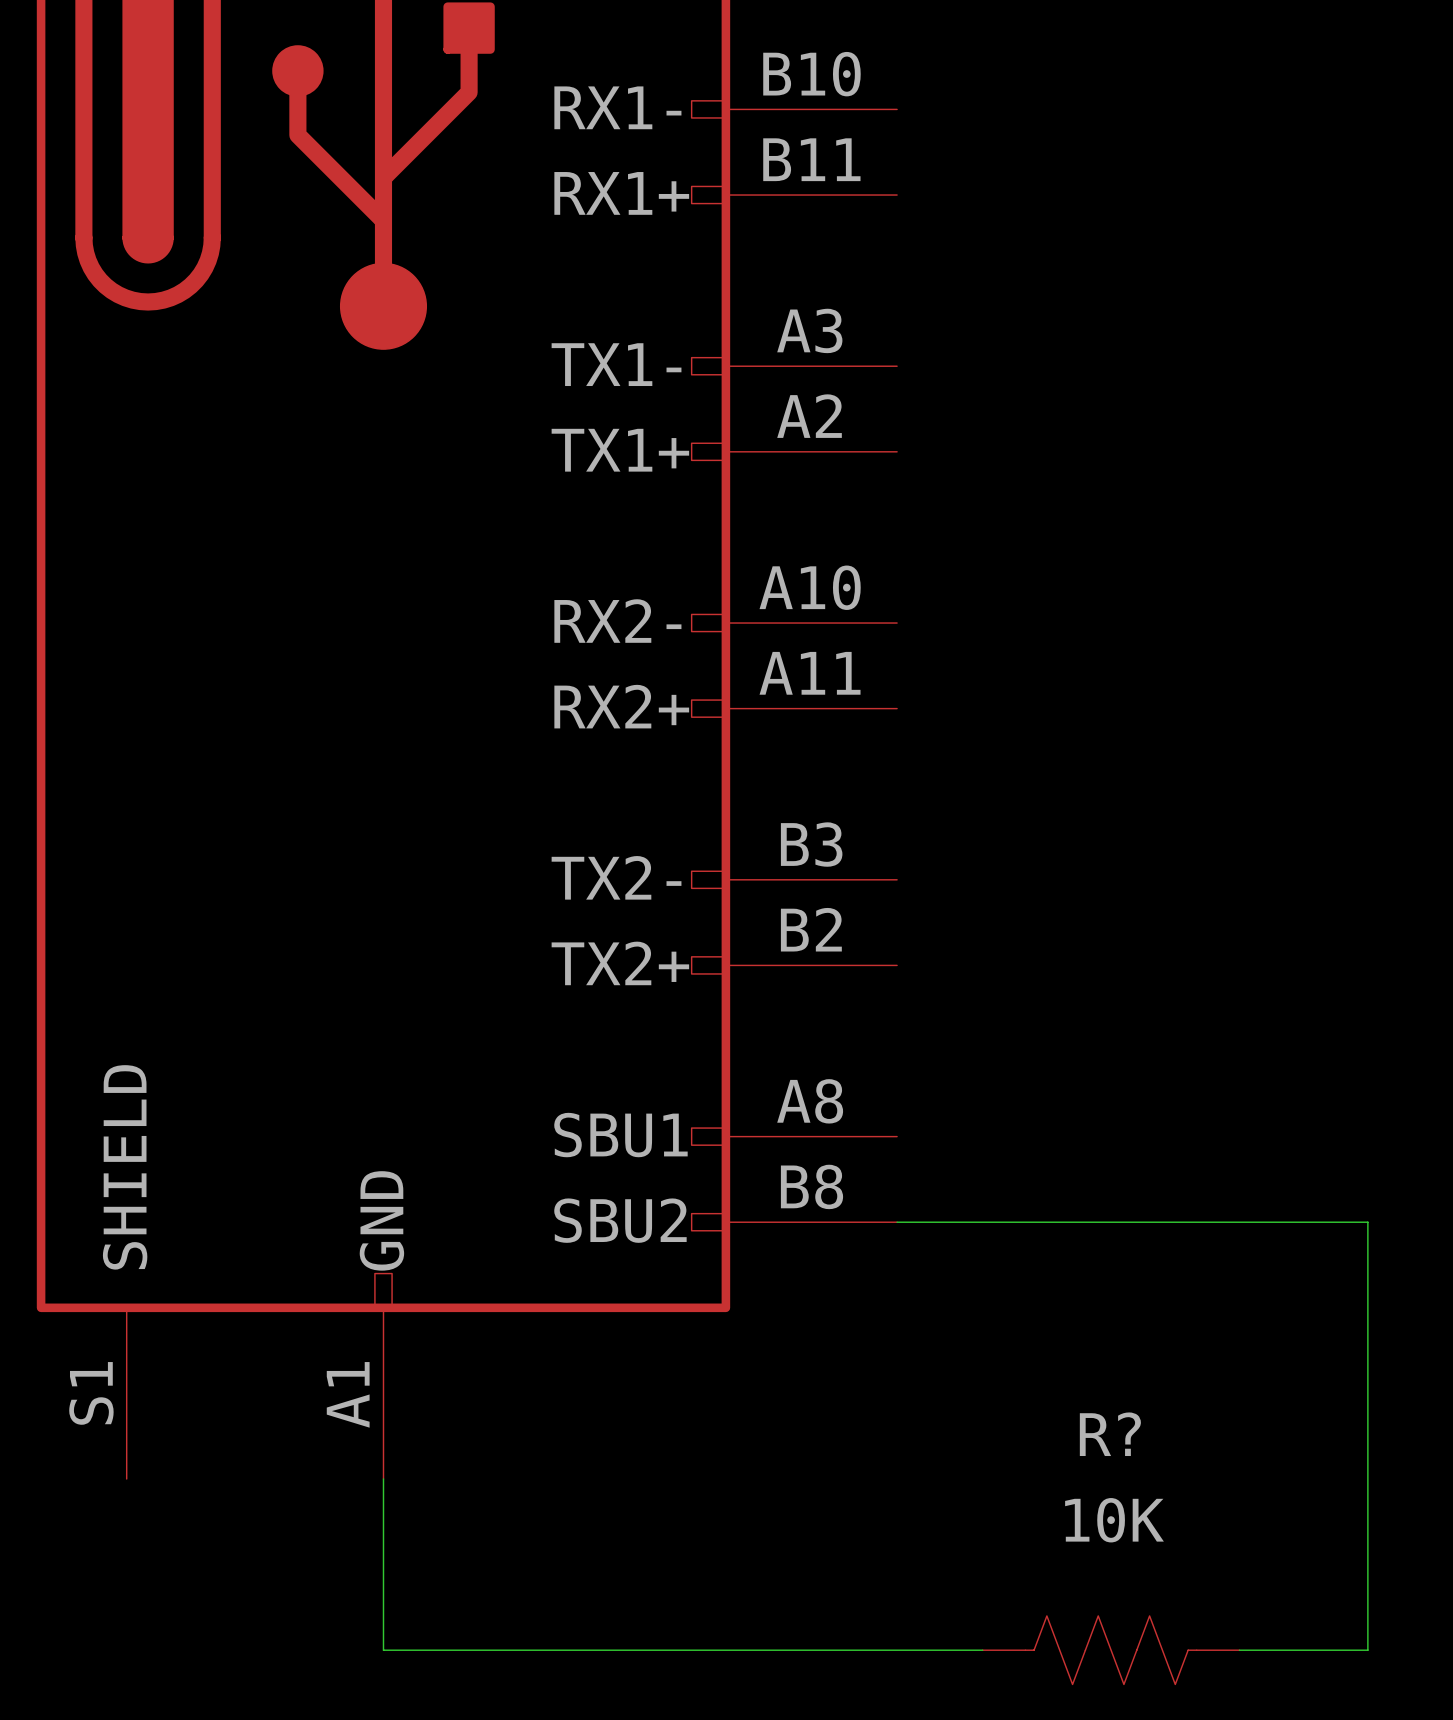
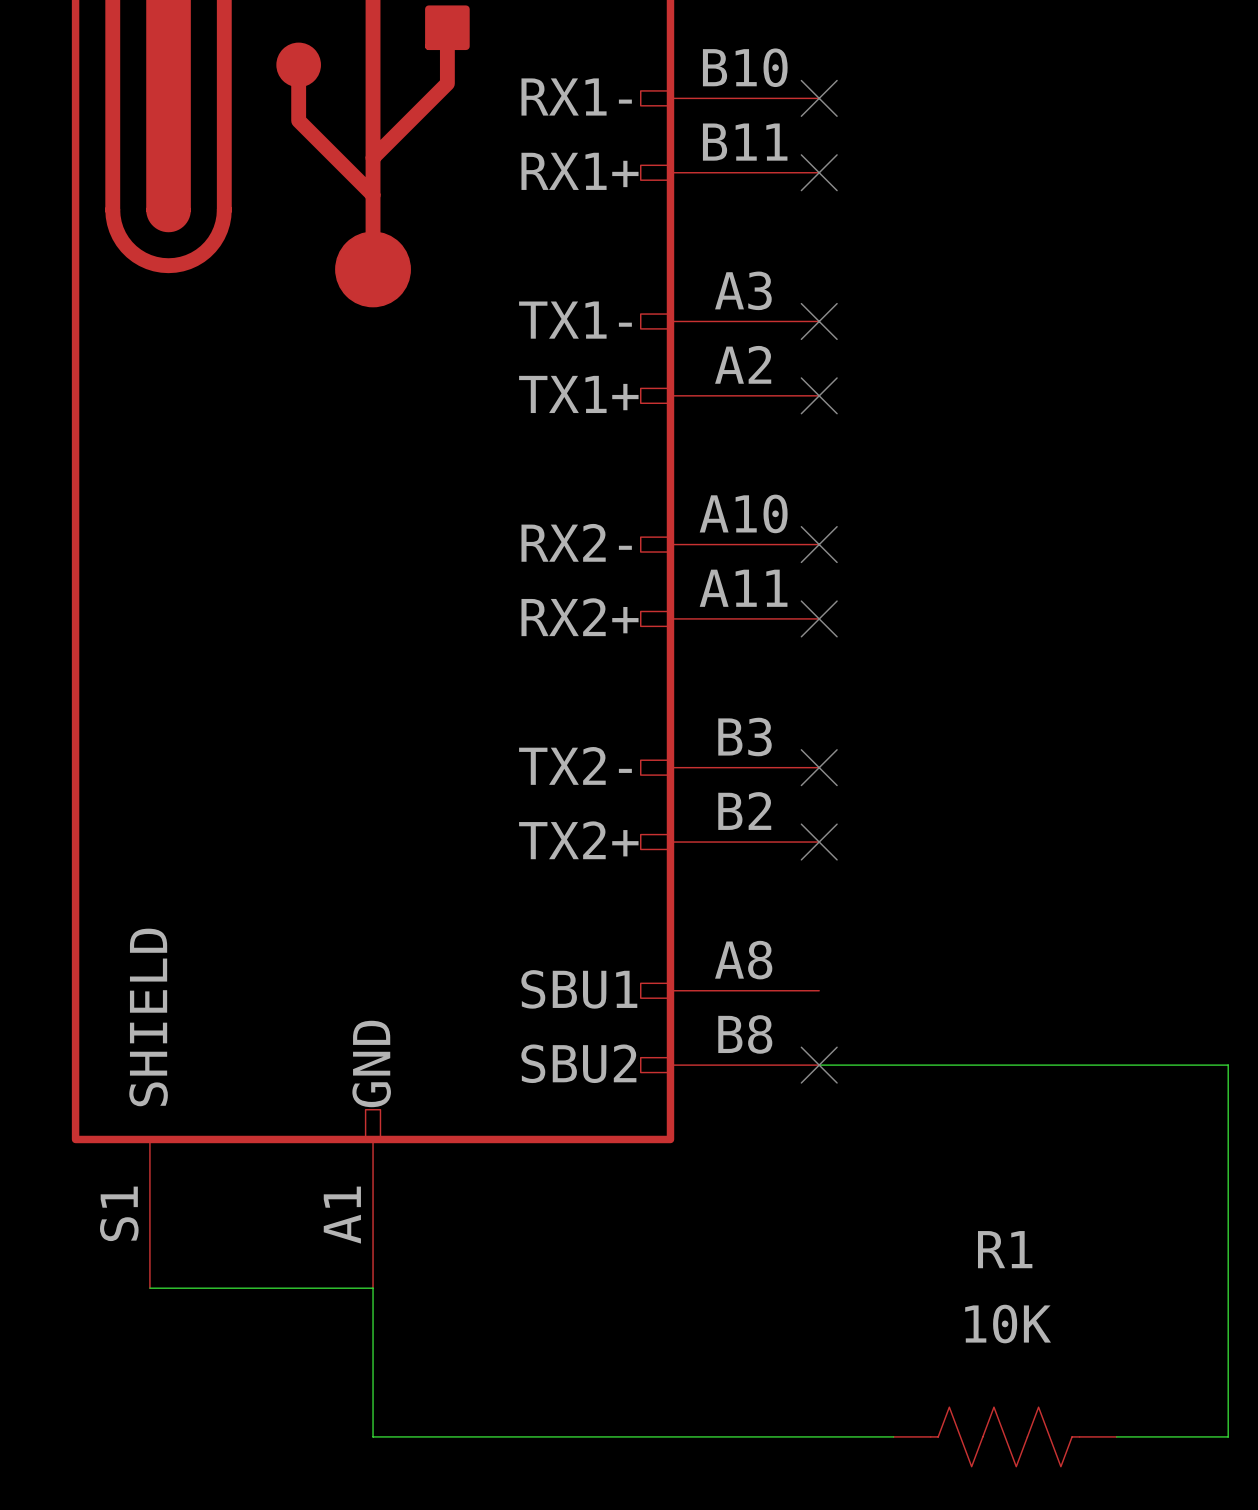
no-connect mark: none -> (819, 98)
no-connect mark: none -> (819, 172)
no-connect mark: none -> (819, 321)
no-connect mark: none -> (819, 395)
no-connect mark: none -> (819, 544)
no-connect mark: none -> (819, 618)
no-connect mark: none -> (819, 767)
no-connect mark: none -> (819, 842)
no-connect mark: none -> (819, 1065)
R? name: R? (1110, 1434) -> R1 (1005, 1249)
wire: none -> (149, 1288) (373, 1288)

